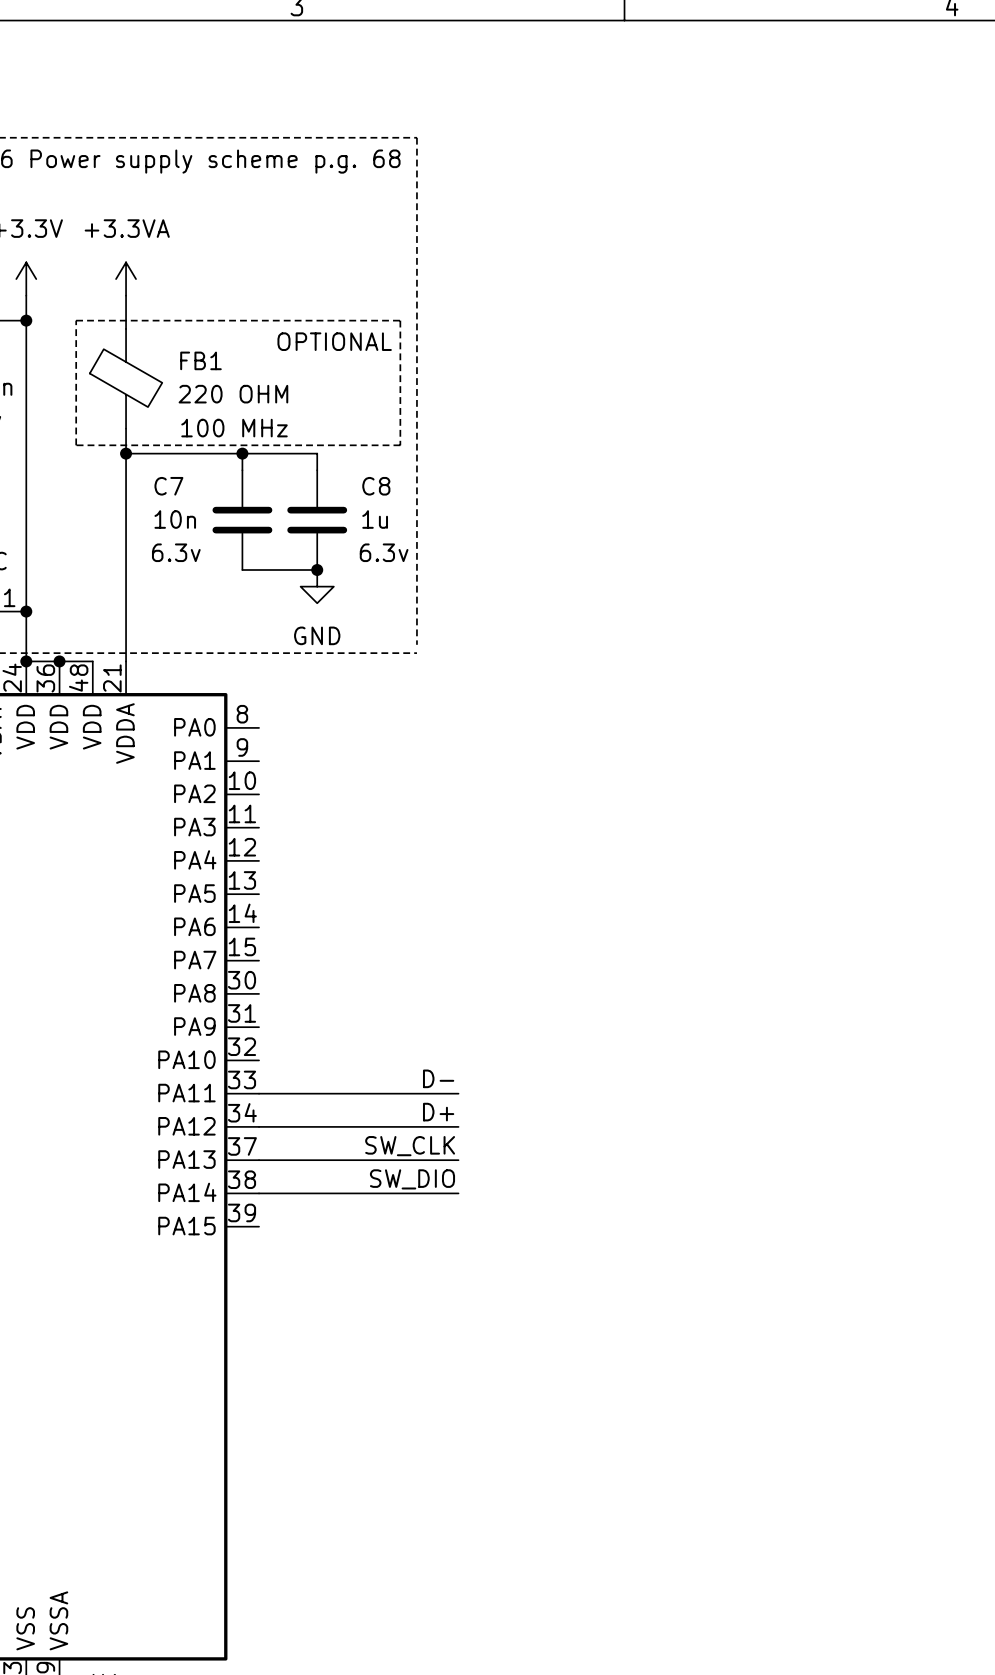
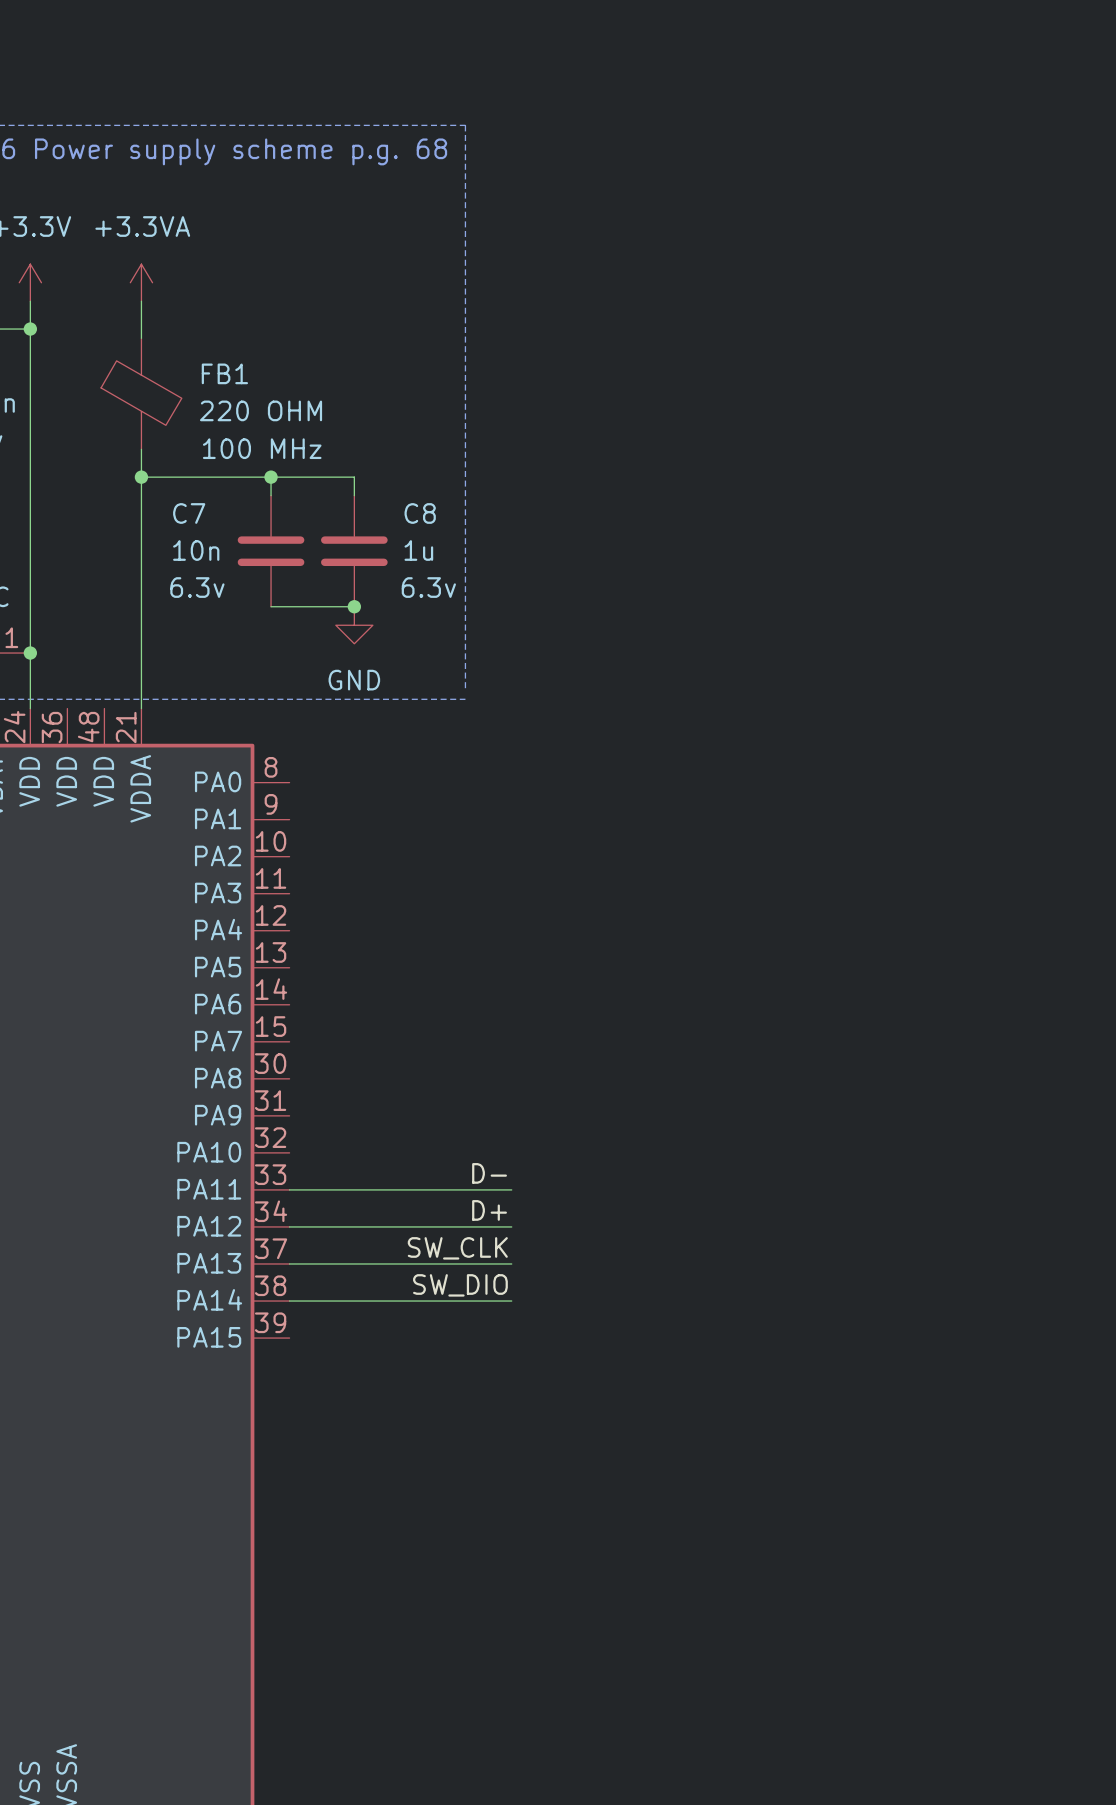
line: (76, 320) (400, 320) (400, 445) (76, 445) (76, 320) -> none
text: OPTIONAL (334, 341) -> none
wire: (26, 661) (92, 661) -> none
junction: (26, 661) -> none
junction: (59, 661) -> none

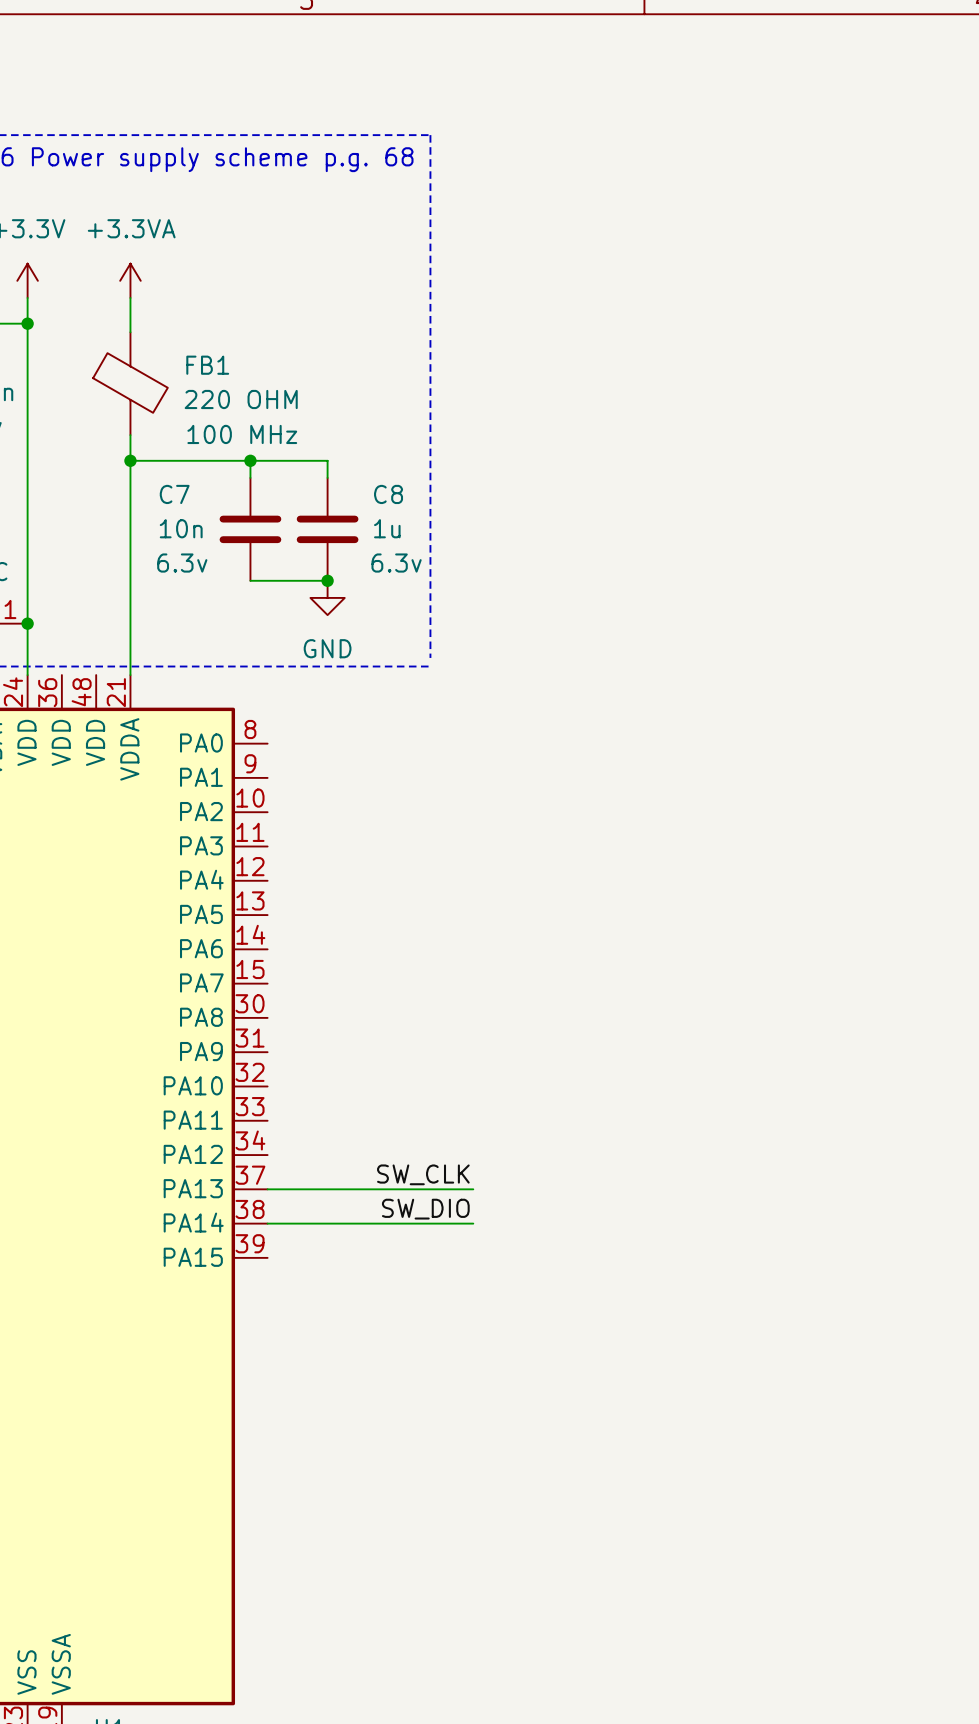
label: D- (489, 1173) -> none
wire: (289, 1189) (511, 1189) -> none
label: D+ (489, 1210) -> none
wire: (289, 1226) (511, 1226) -> none

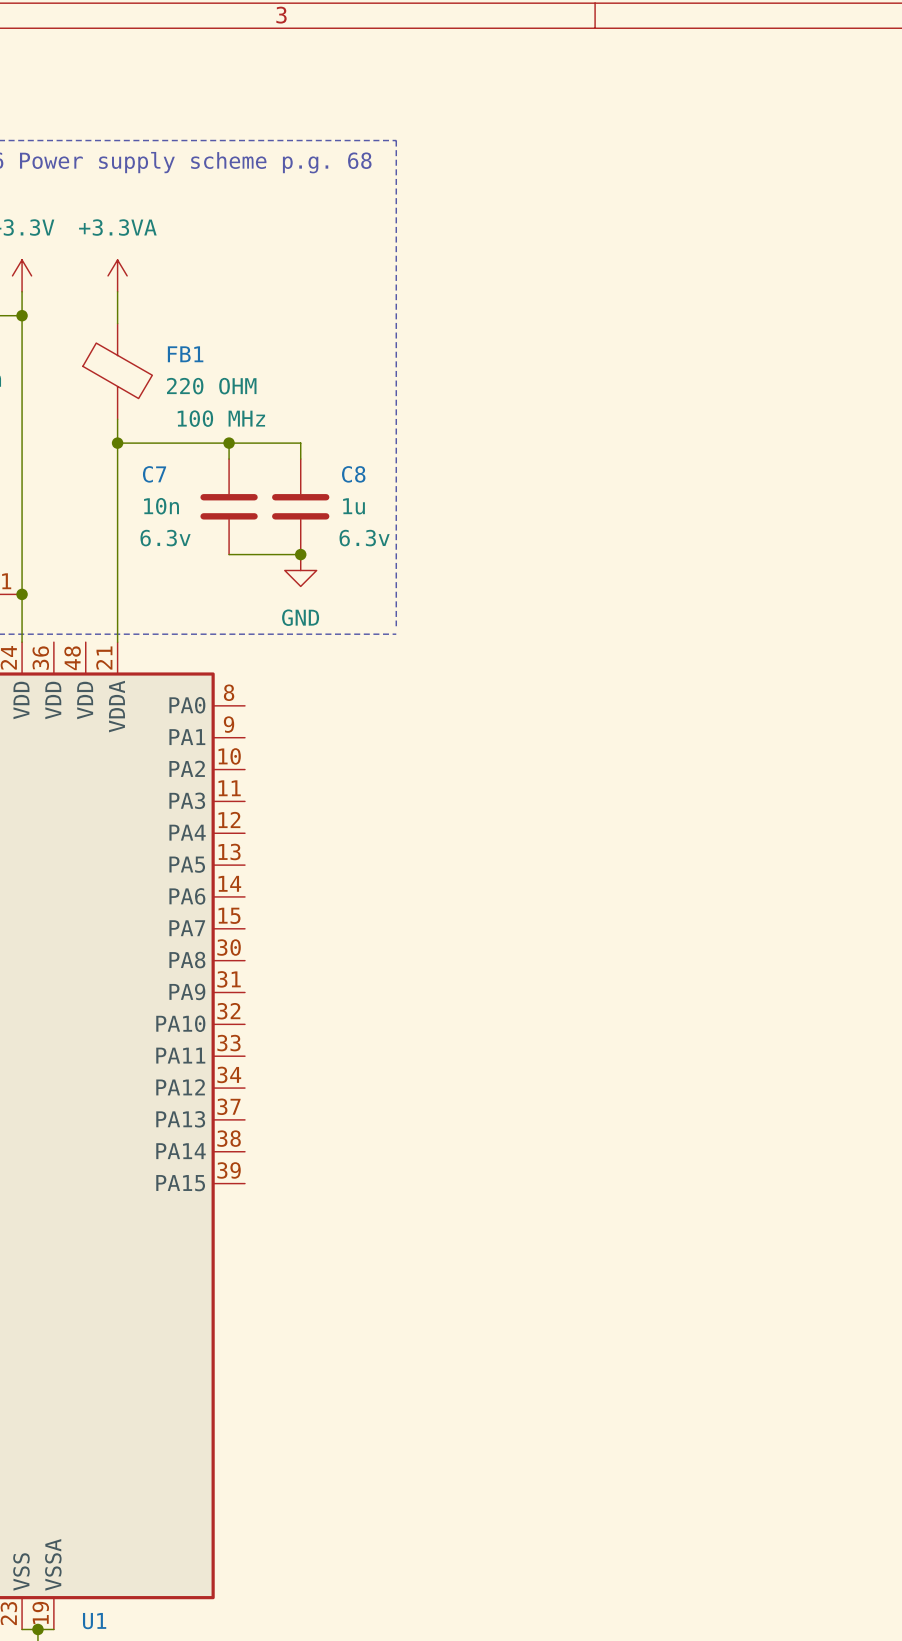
label: SW_CLK (423, 1174) -> none
wire: (267, 1189) (473, 1189) -> none
label: SW_DIO (425, 1209) -> none
wire: (267, 1223) (473, 1223) -> none

